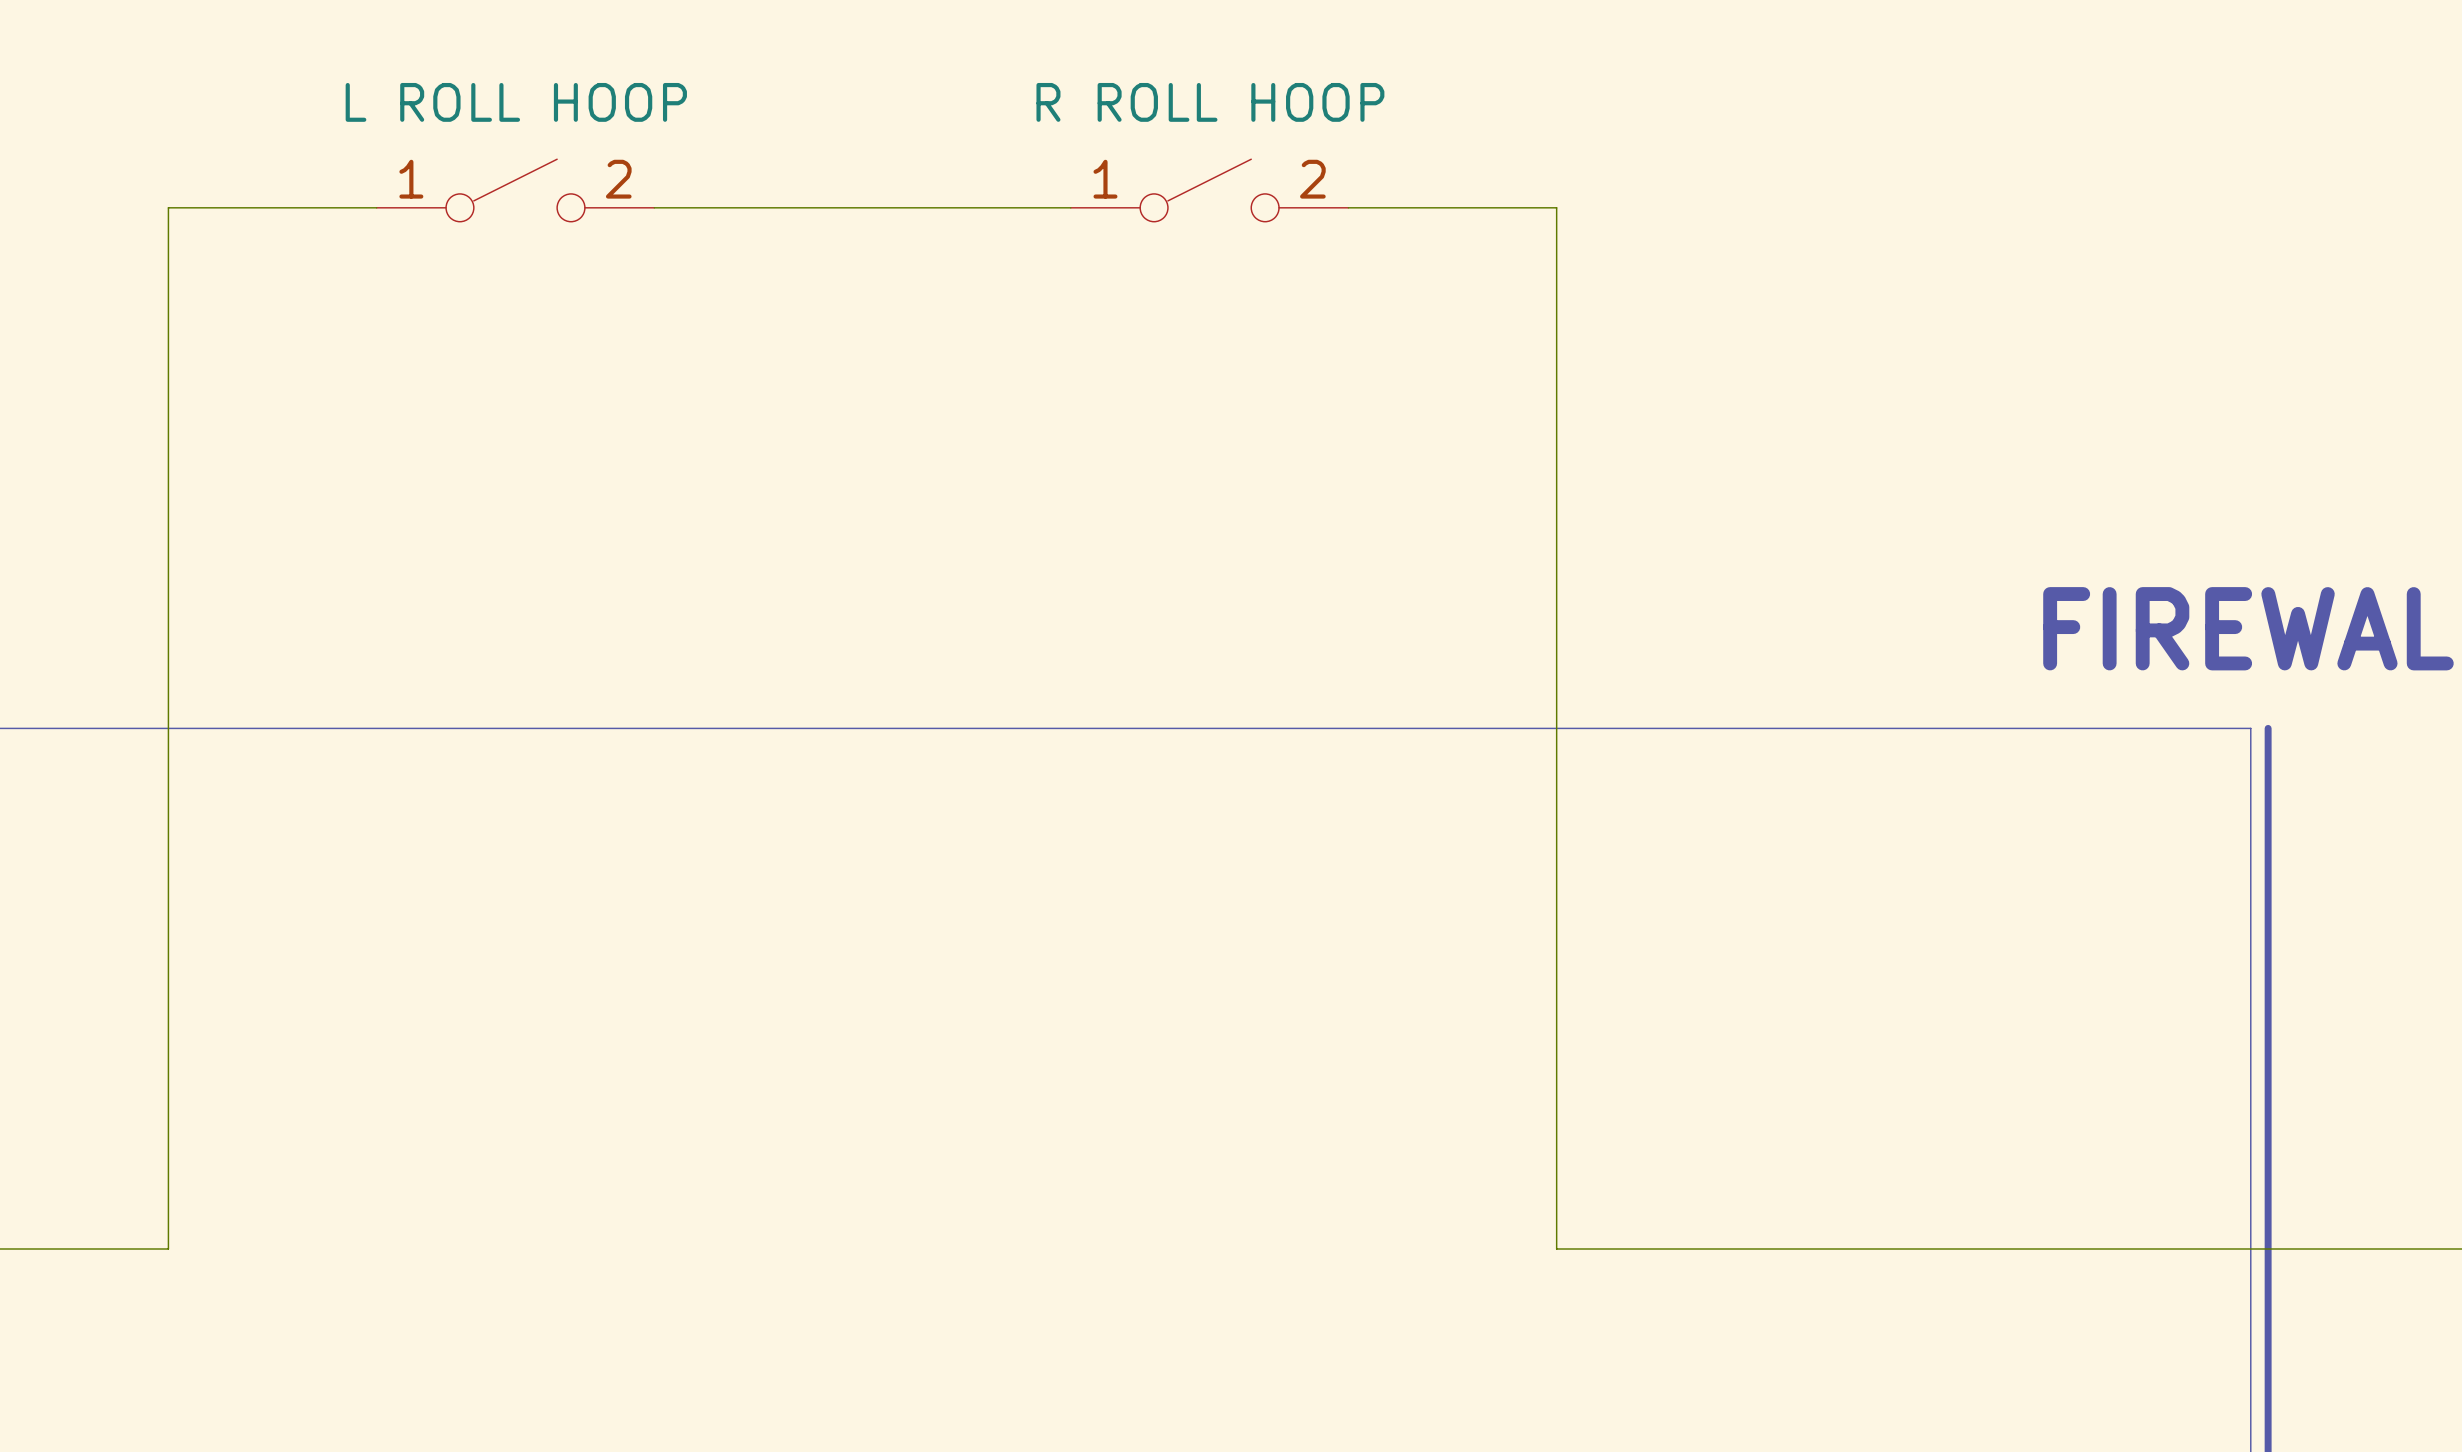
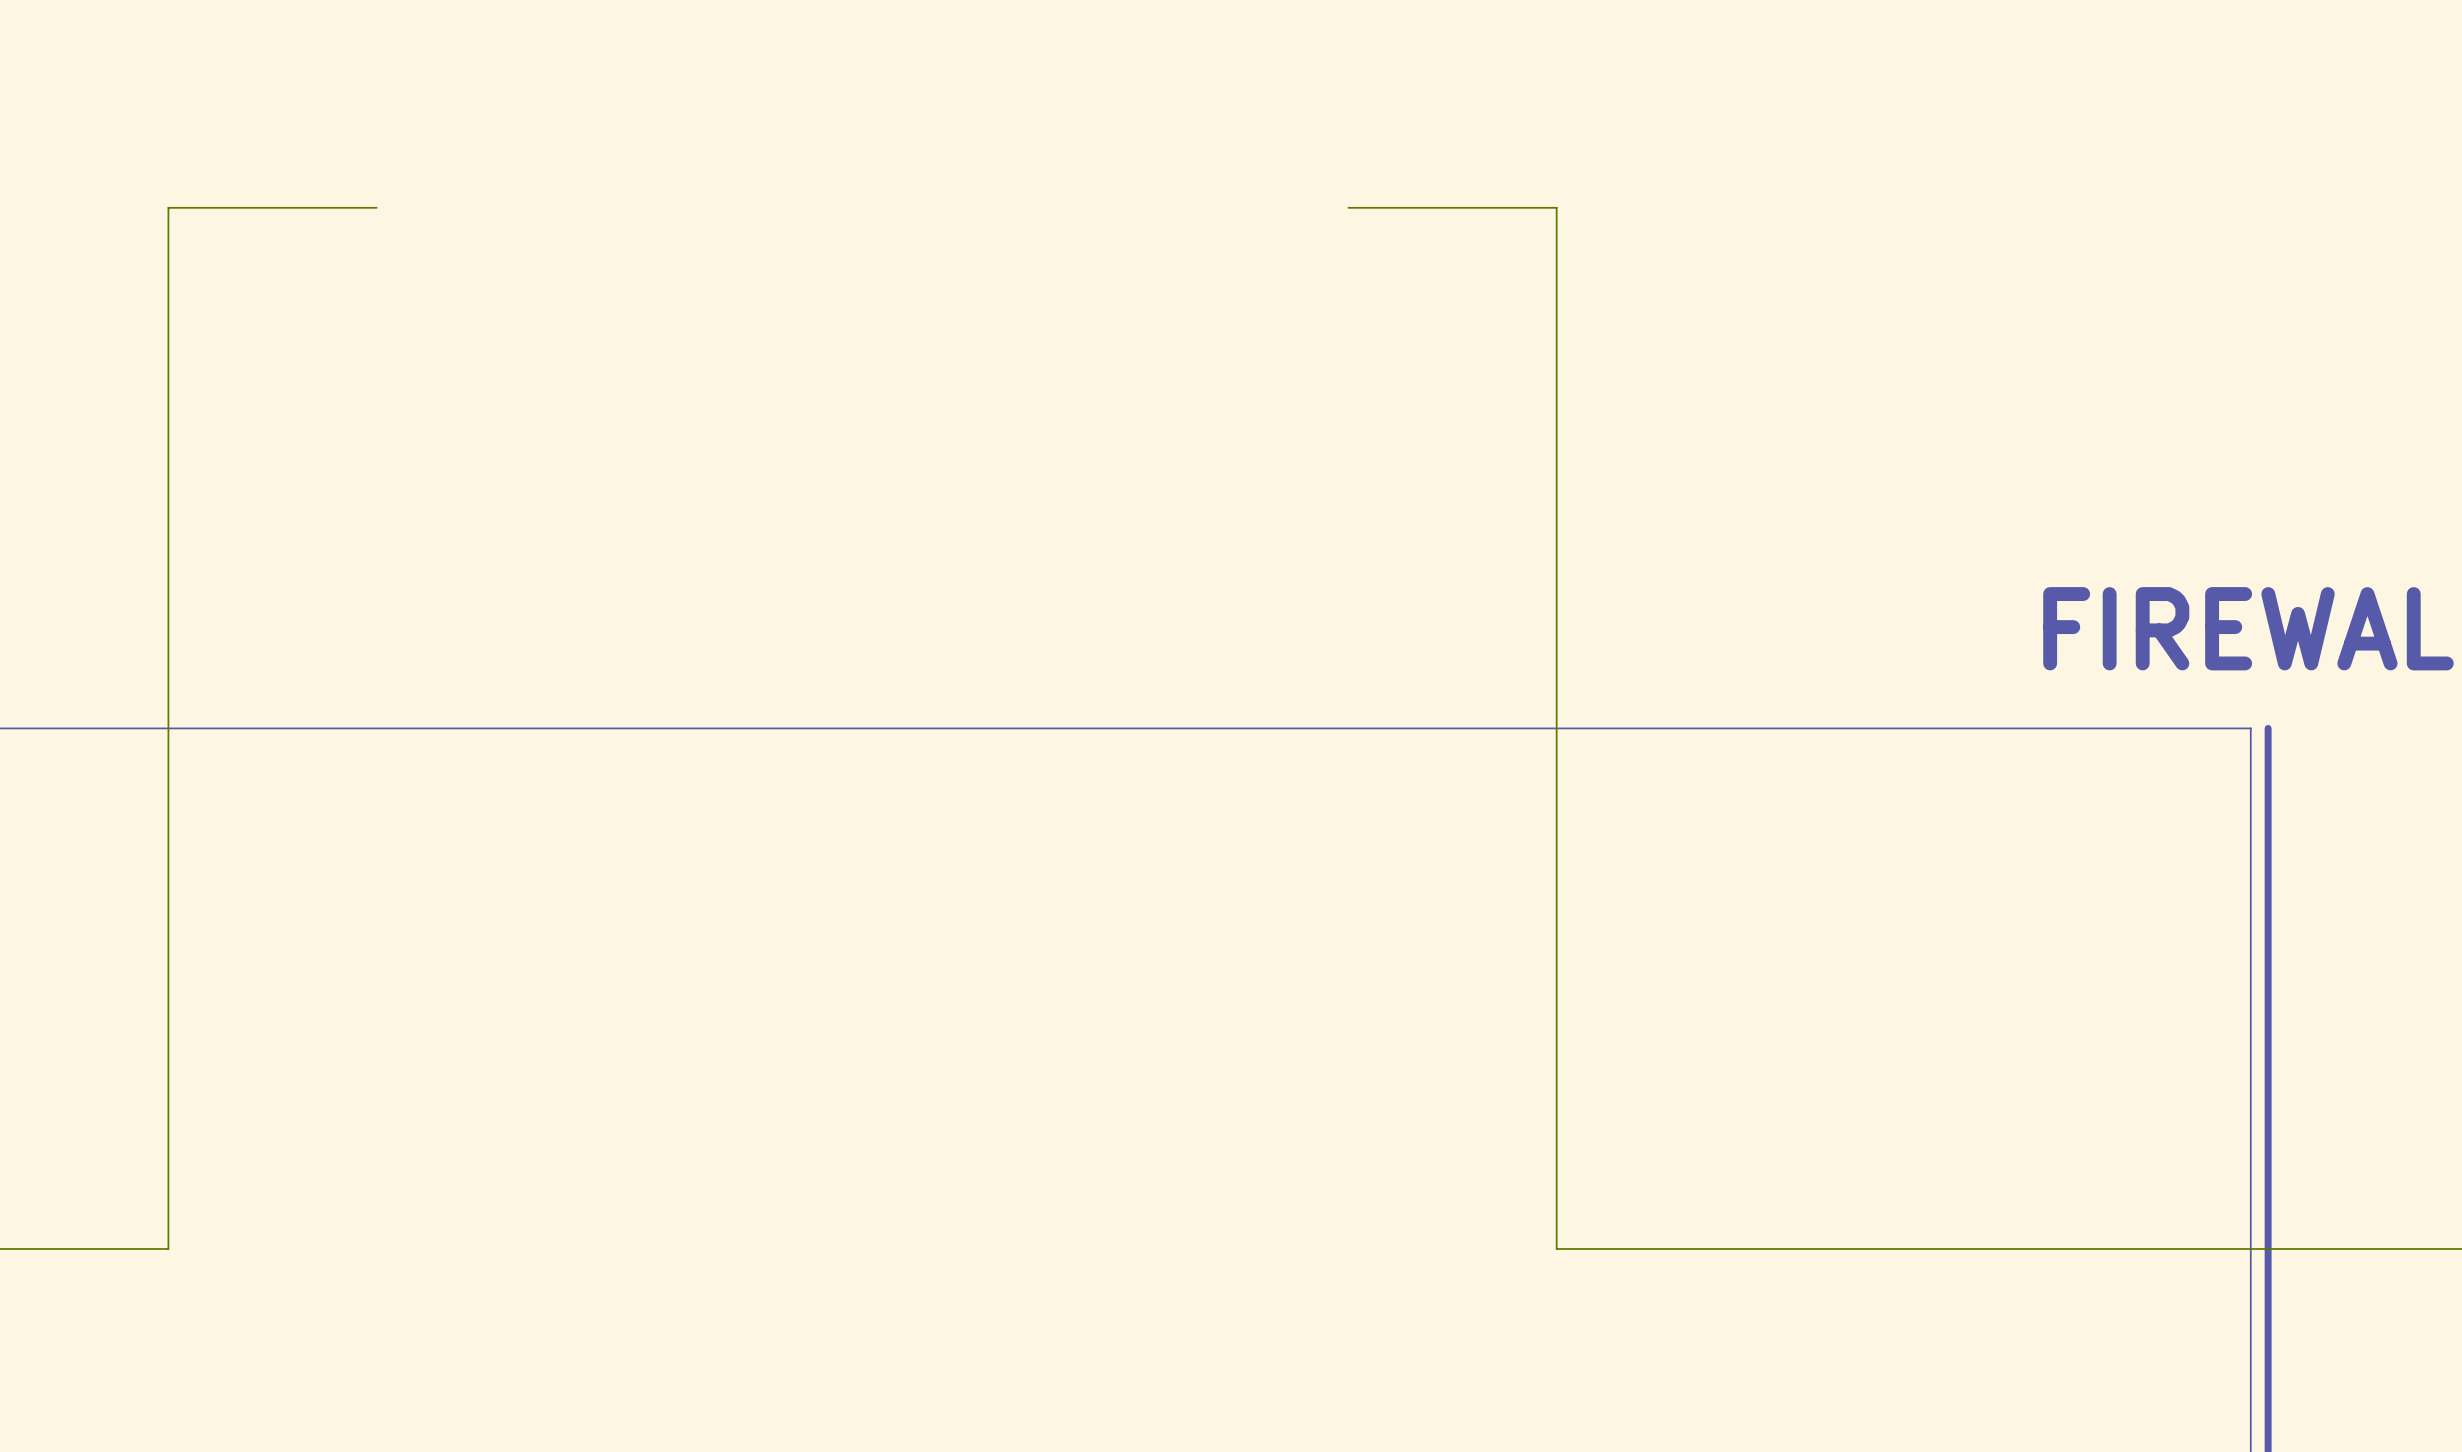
part: L ROLL HOOP (515, 190) -> none
part: R ROLL HOOP (1209, 190) -> none
wire: (654, 207) (1070, 207) -> none

